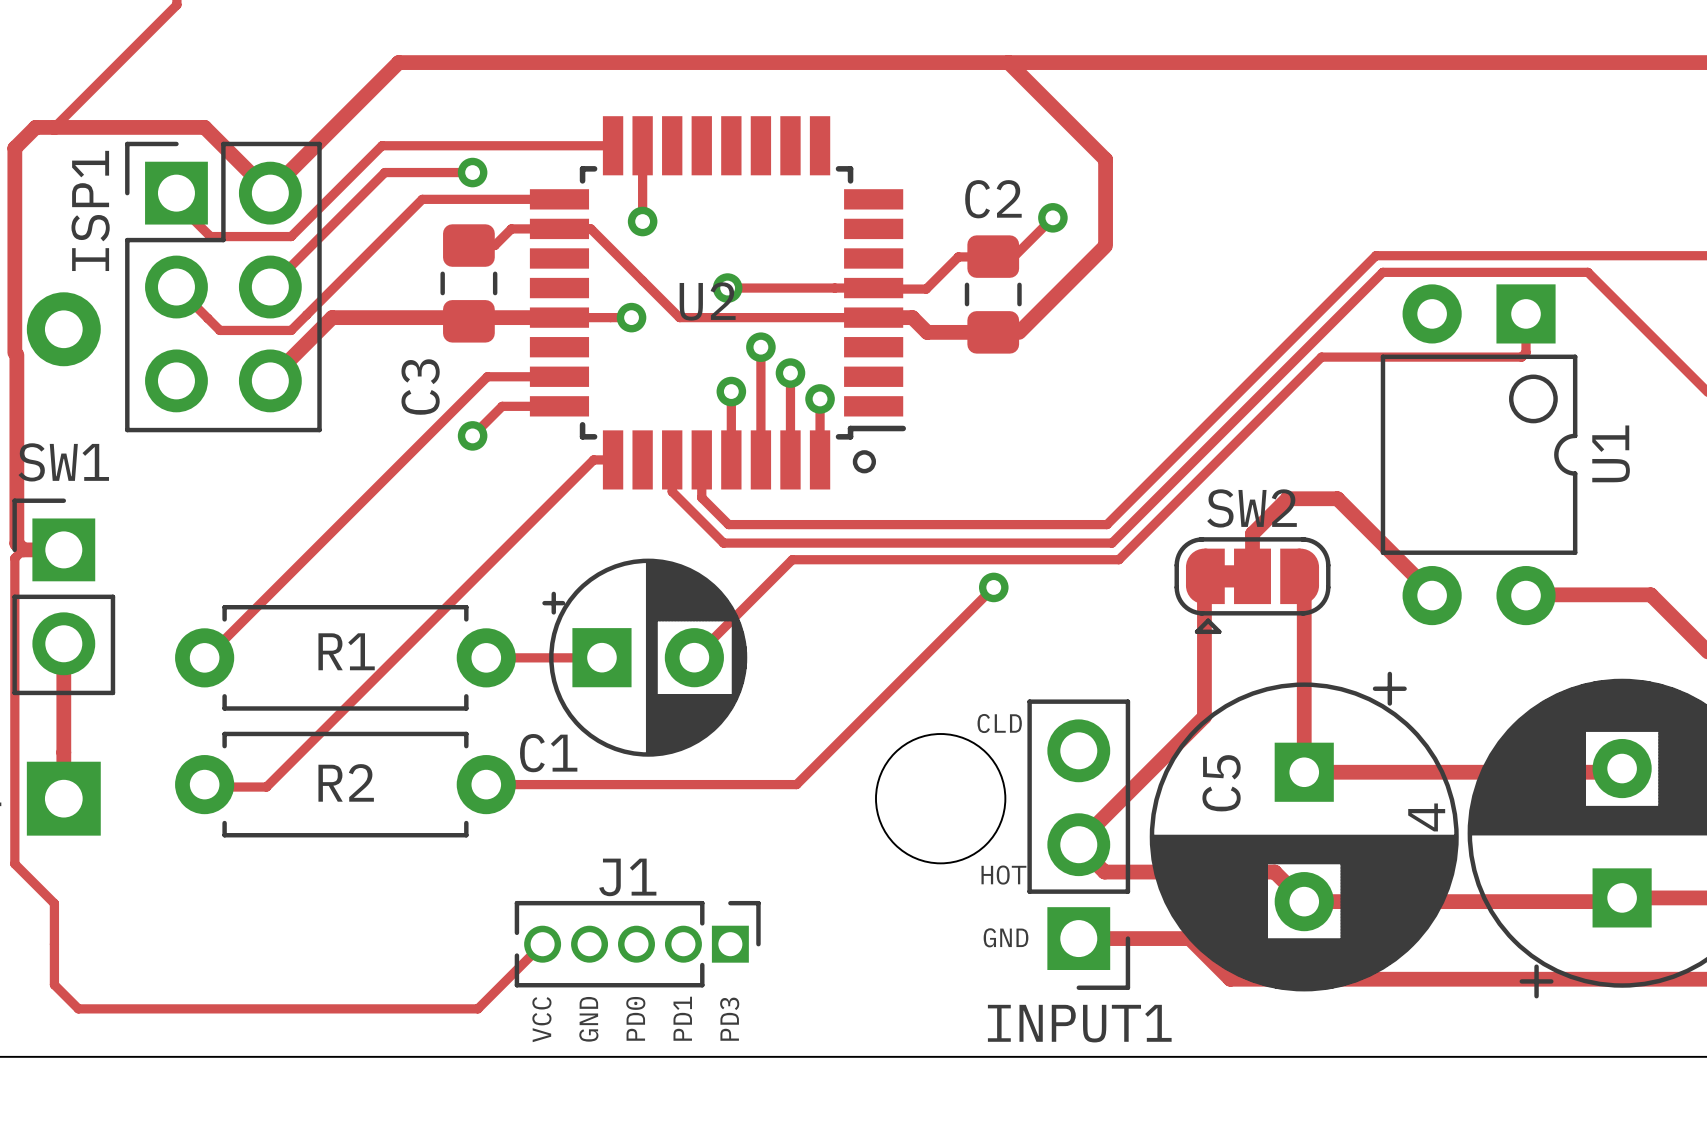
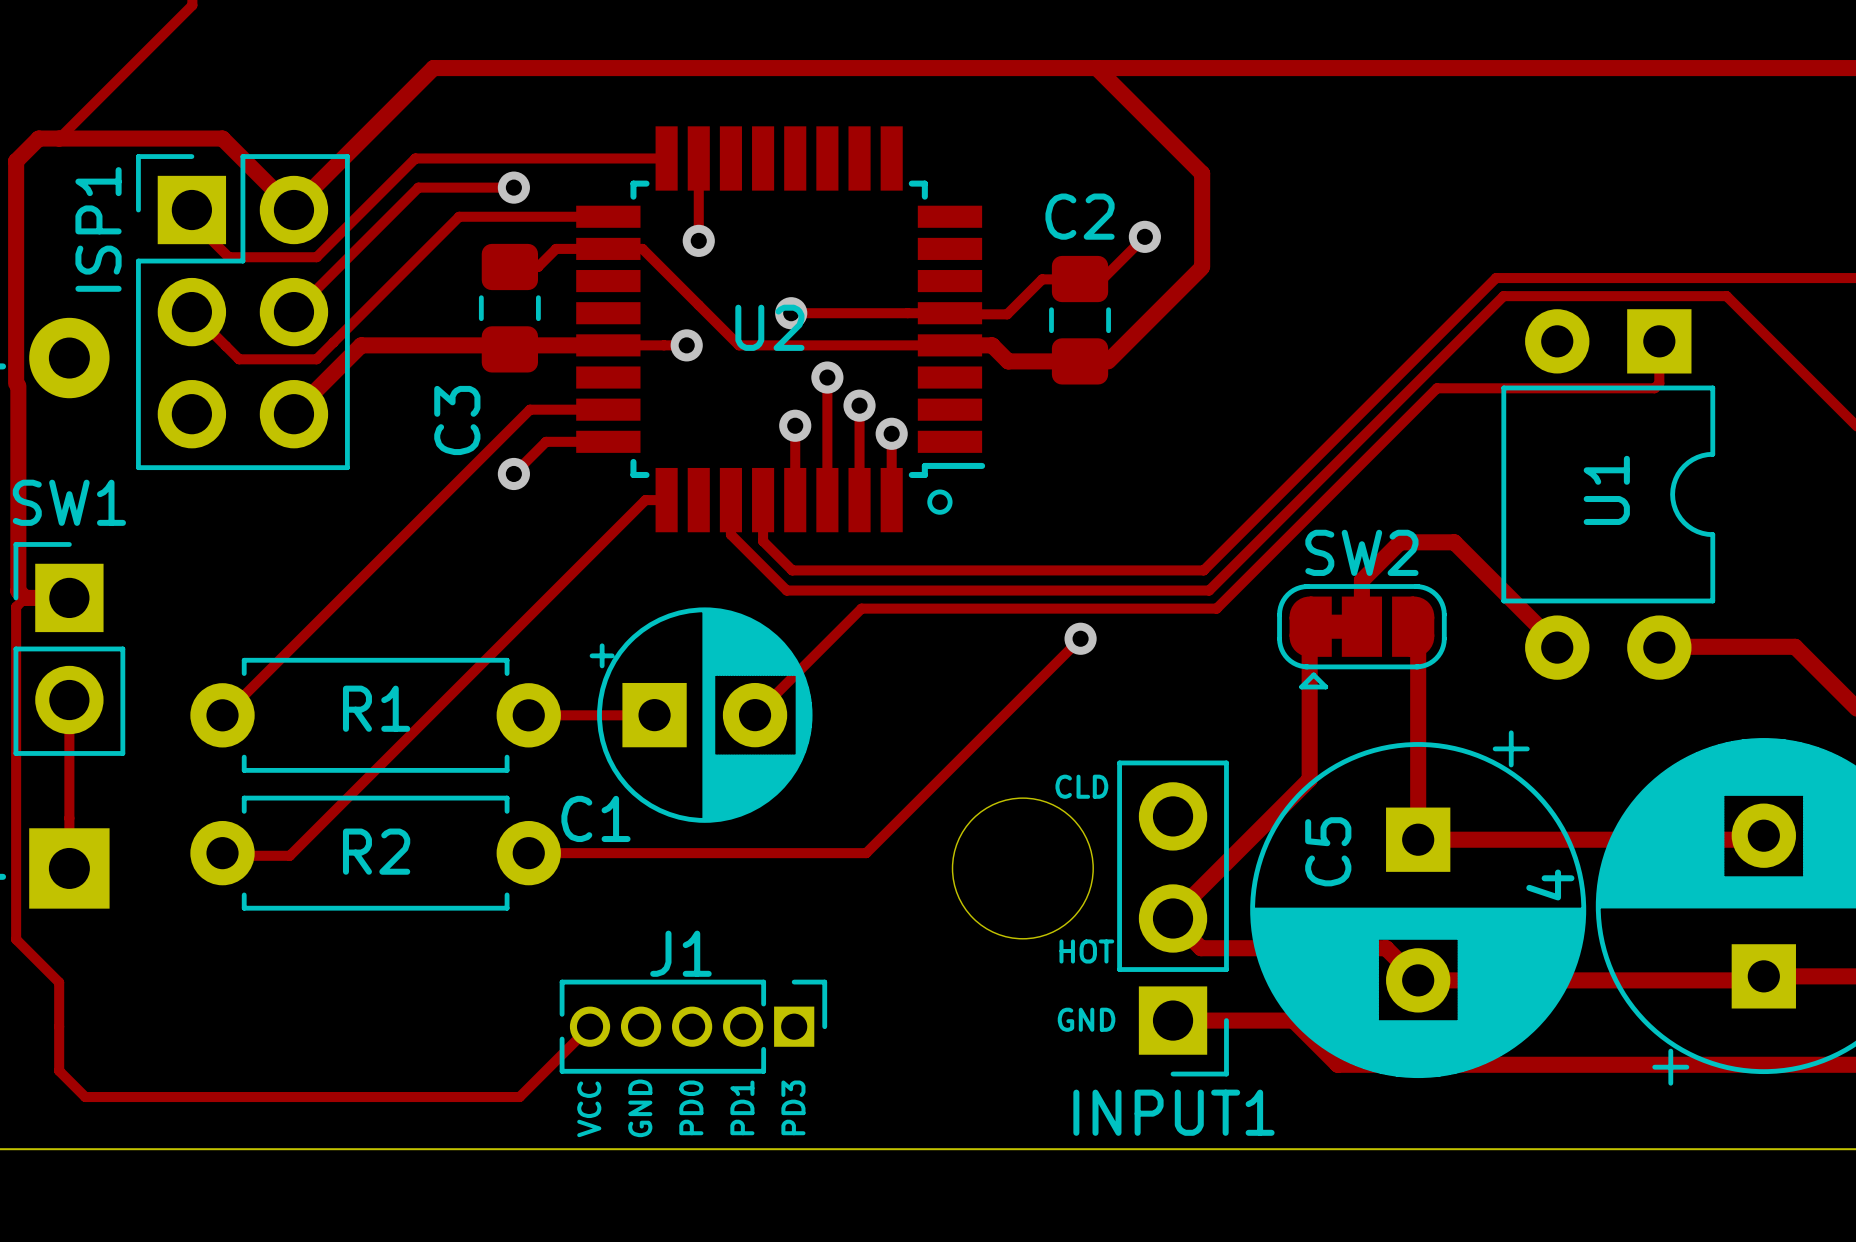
U1 footprint: [1380, 284, 1578, 626] -> [1501, 309, 1716, 680]
U1 name position: U1 (1611, 453) -> U1 (1606, 490)
track width: thick (63, 643) (63, 798) -> thin (69, 700) (69, 868)

